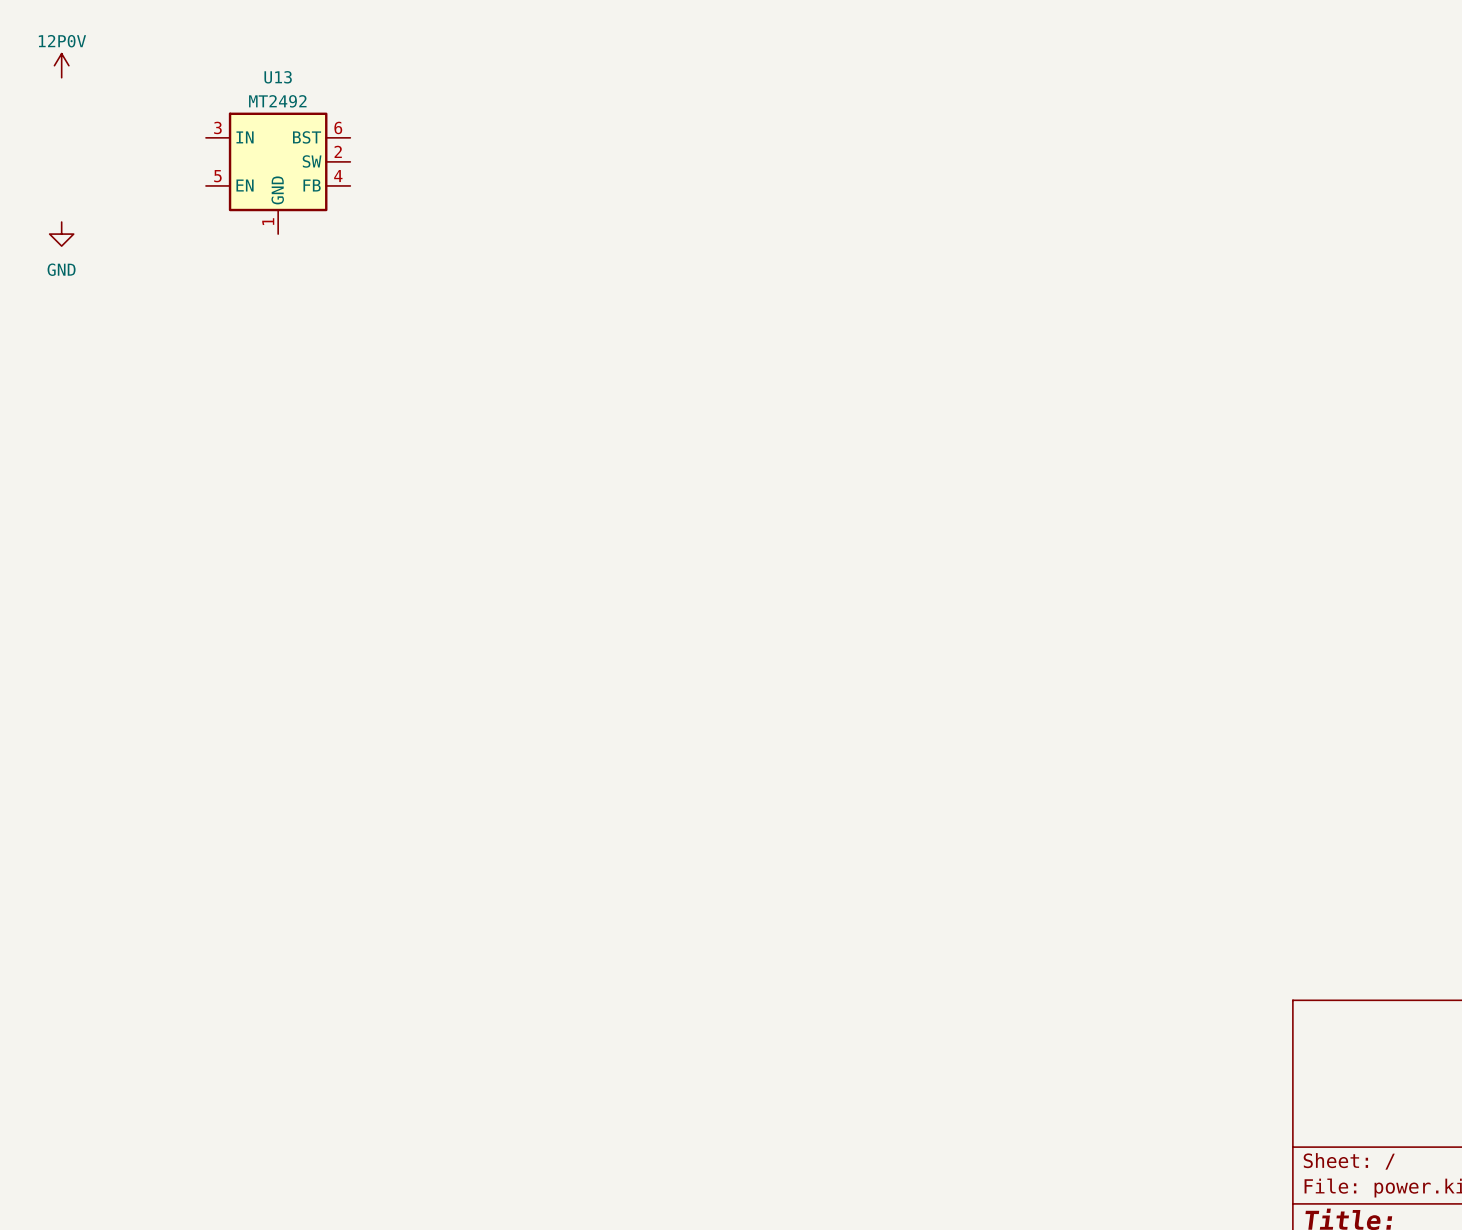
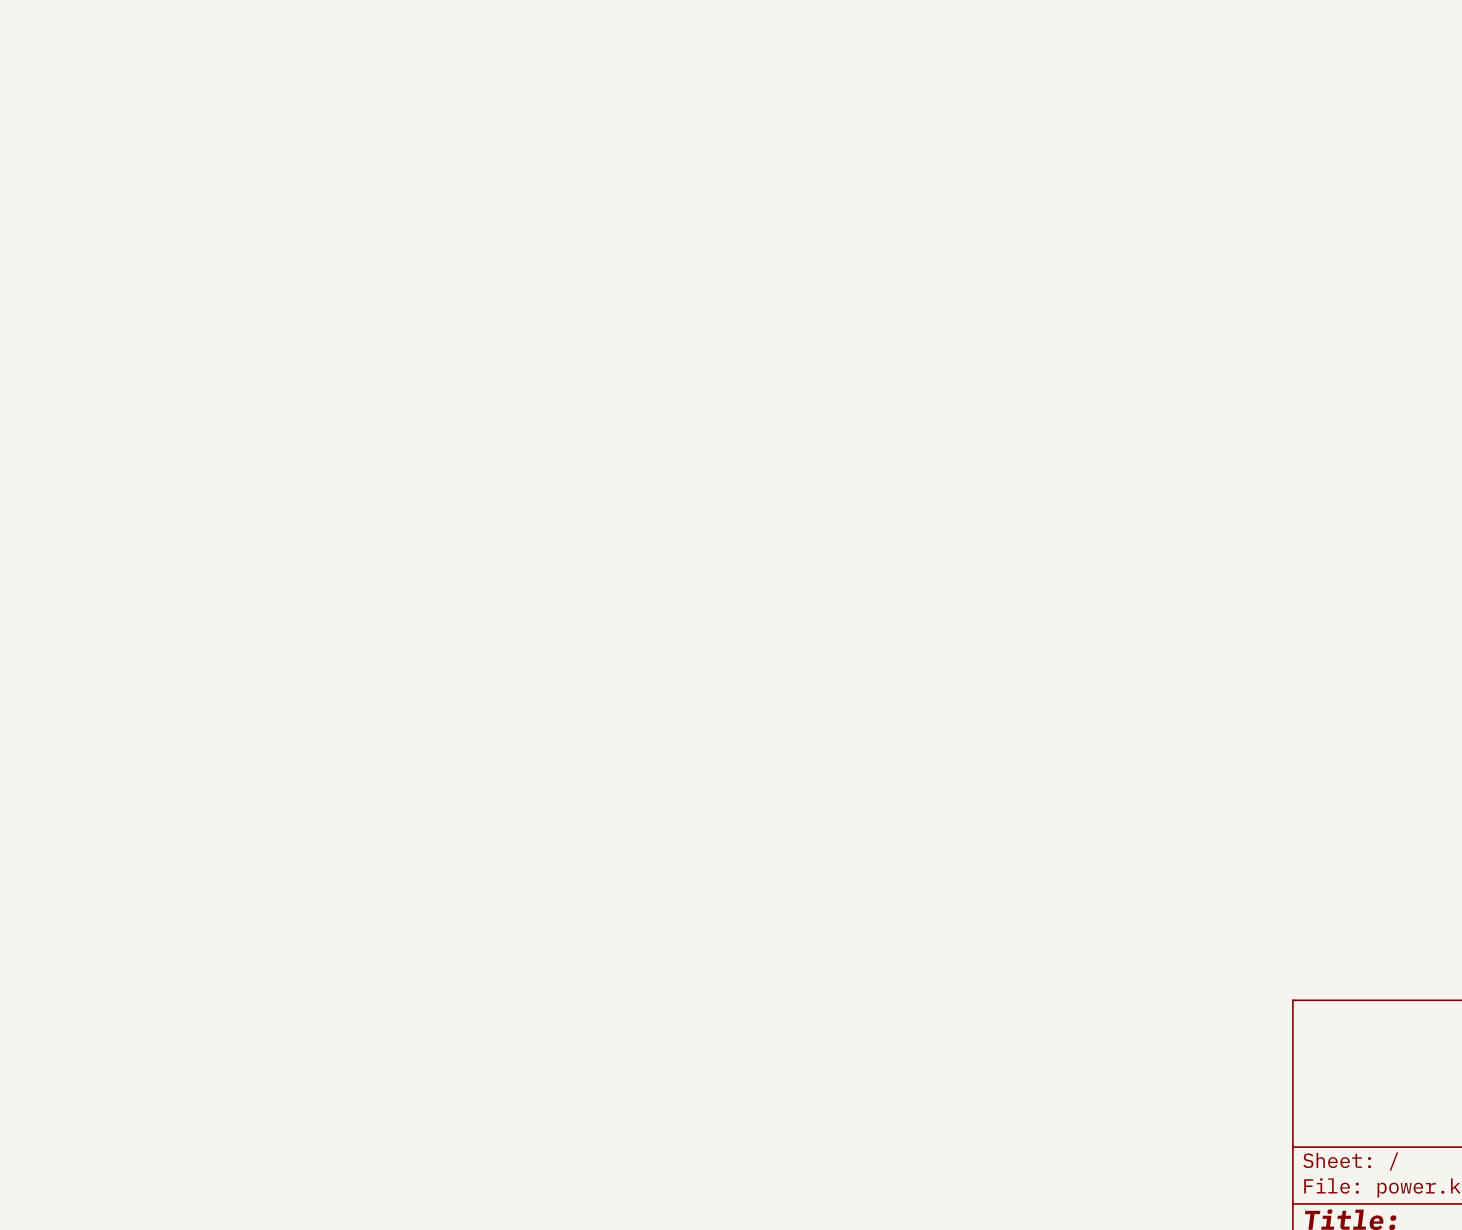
power symbol: 12P0V (61, 65) -> none
U13: MT2492 (278, 173) -> none
power symbol: GND (61, 234) -> none

